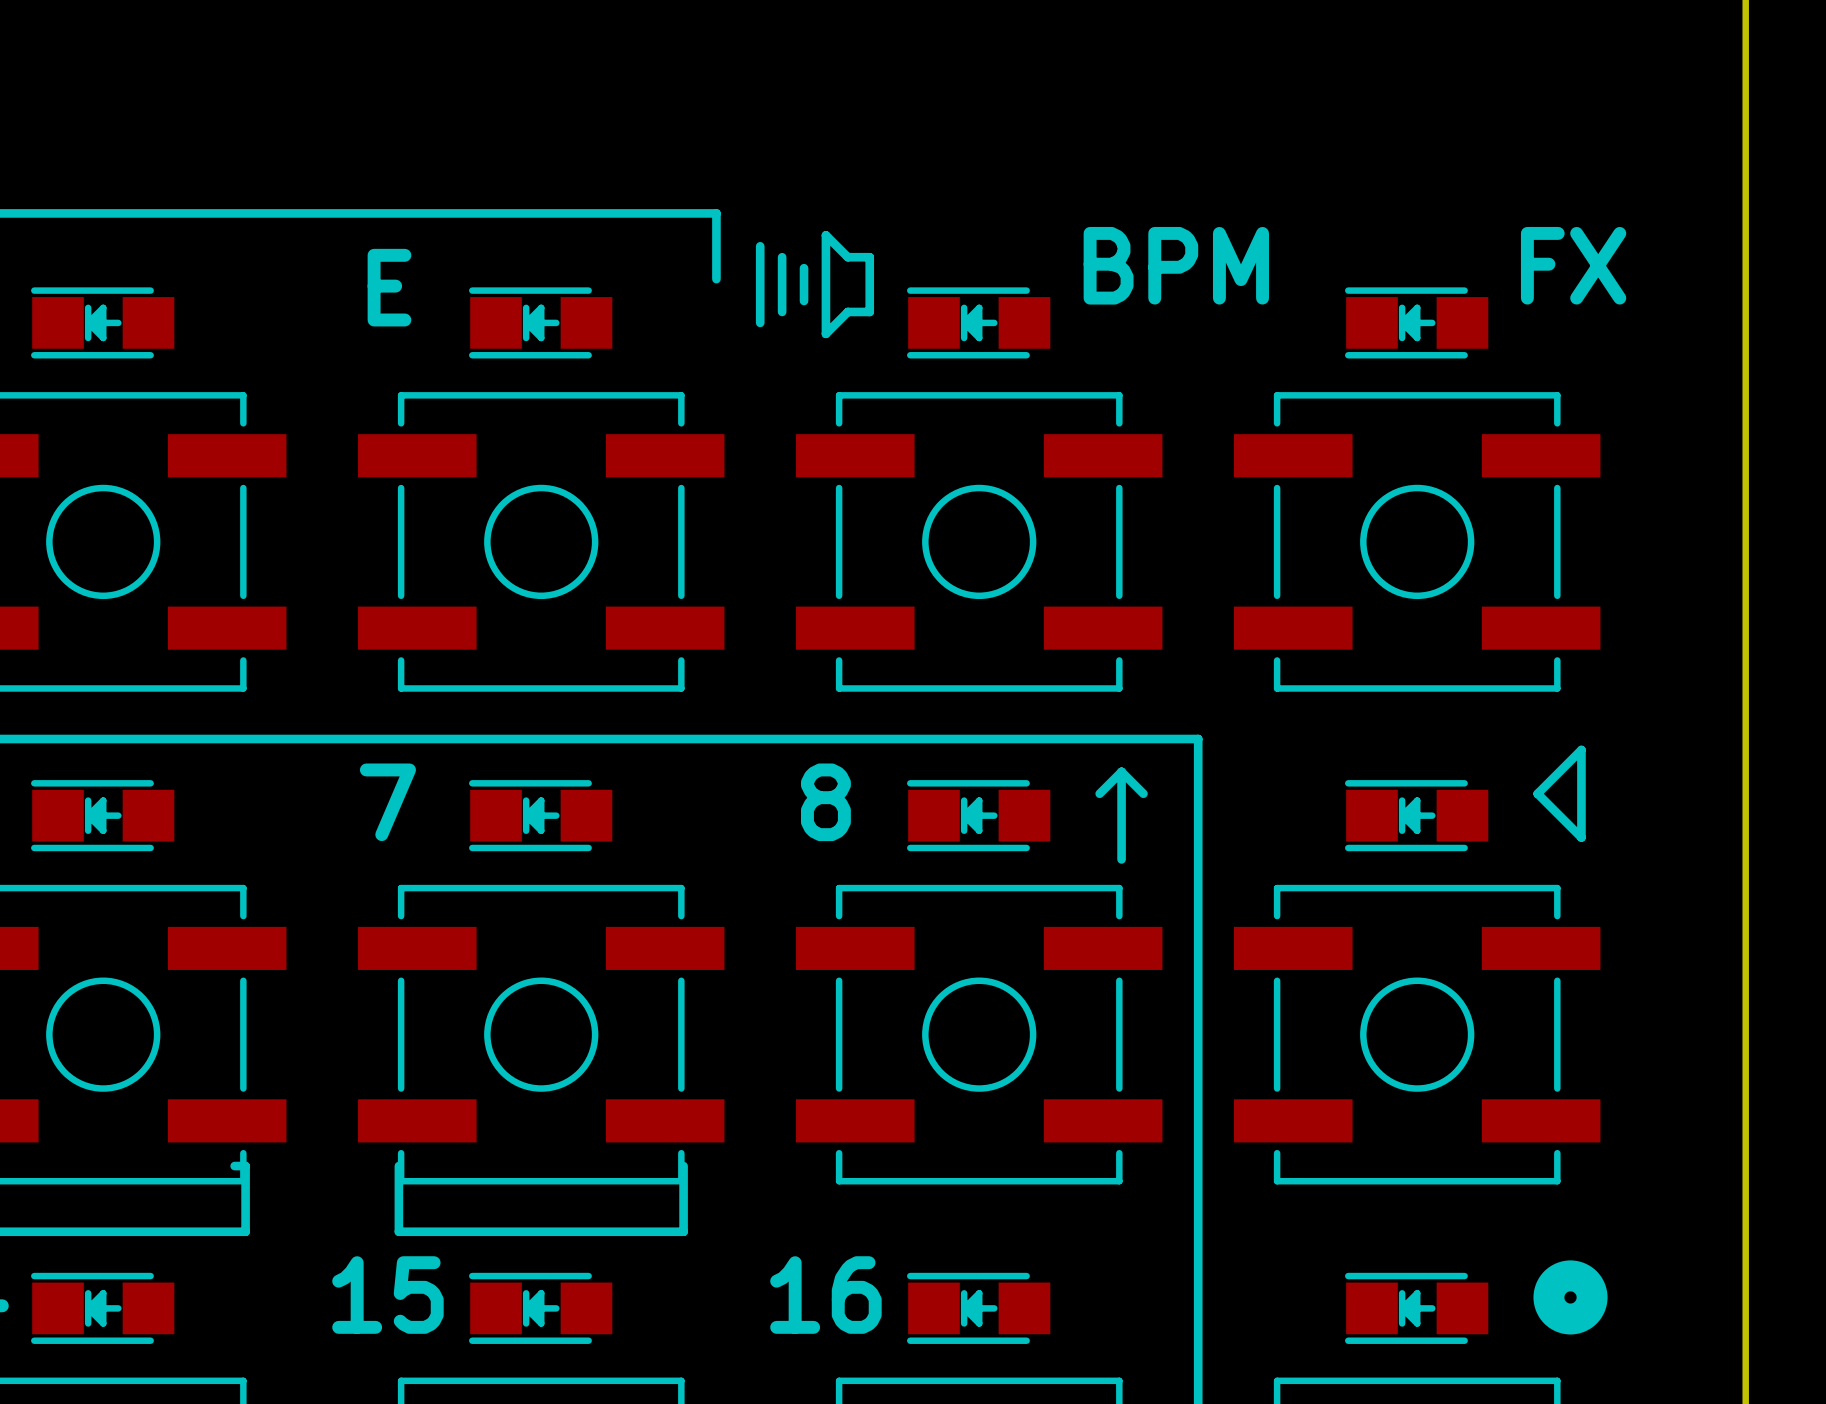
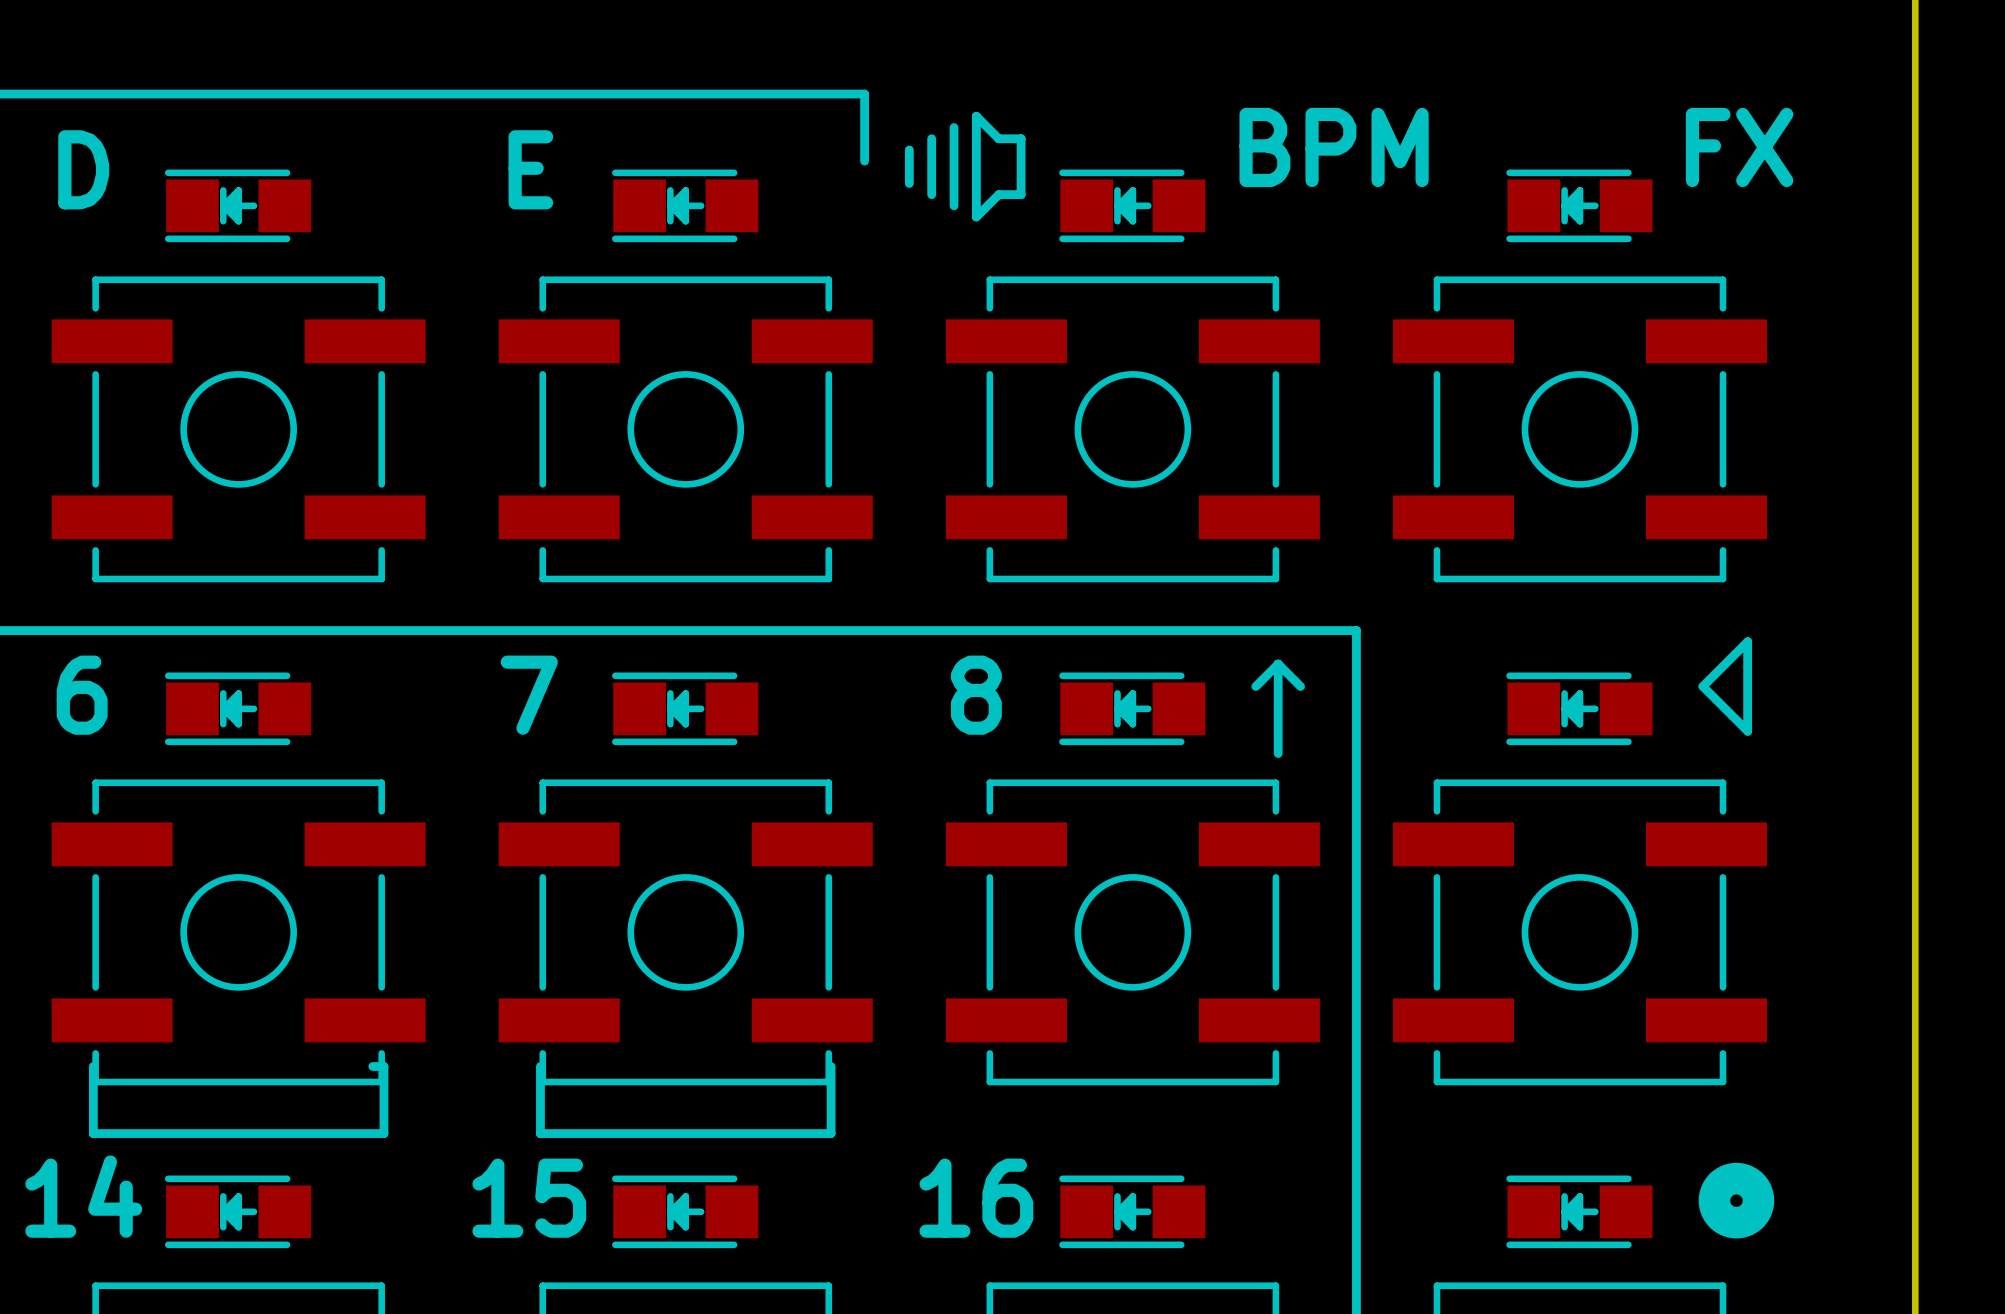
line: (760, 246) (760, 268) -> (954, 127) (954, 149)
line: (760, 301) (760, 322) -> (954, 183) (954, 205)

